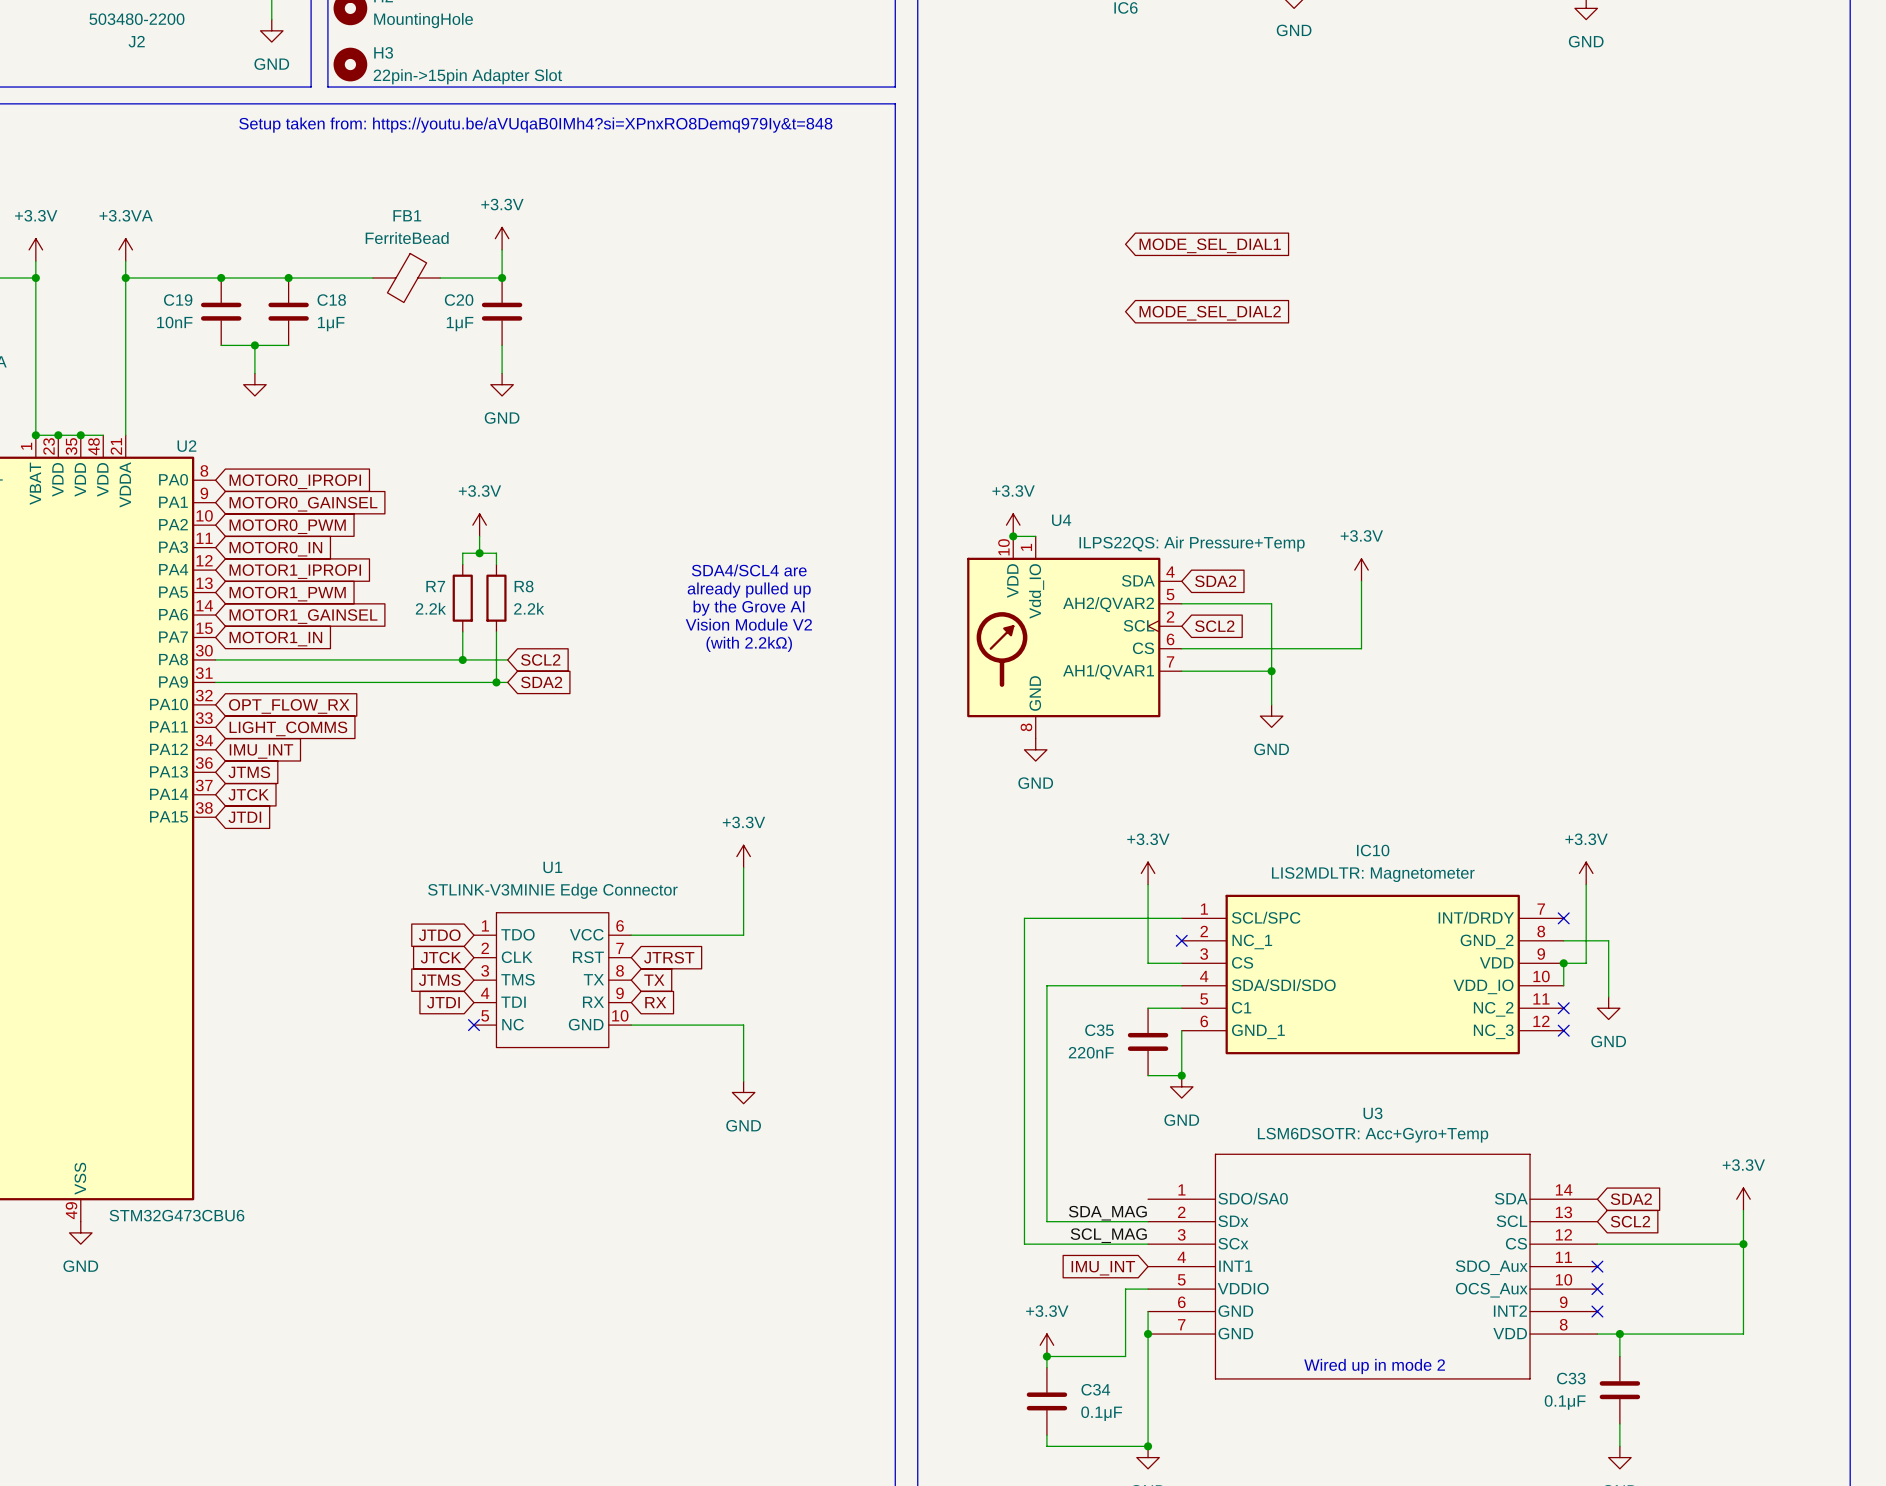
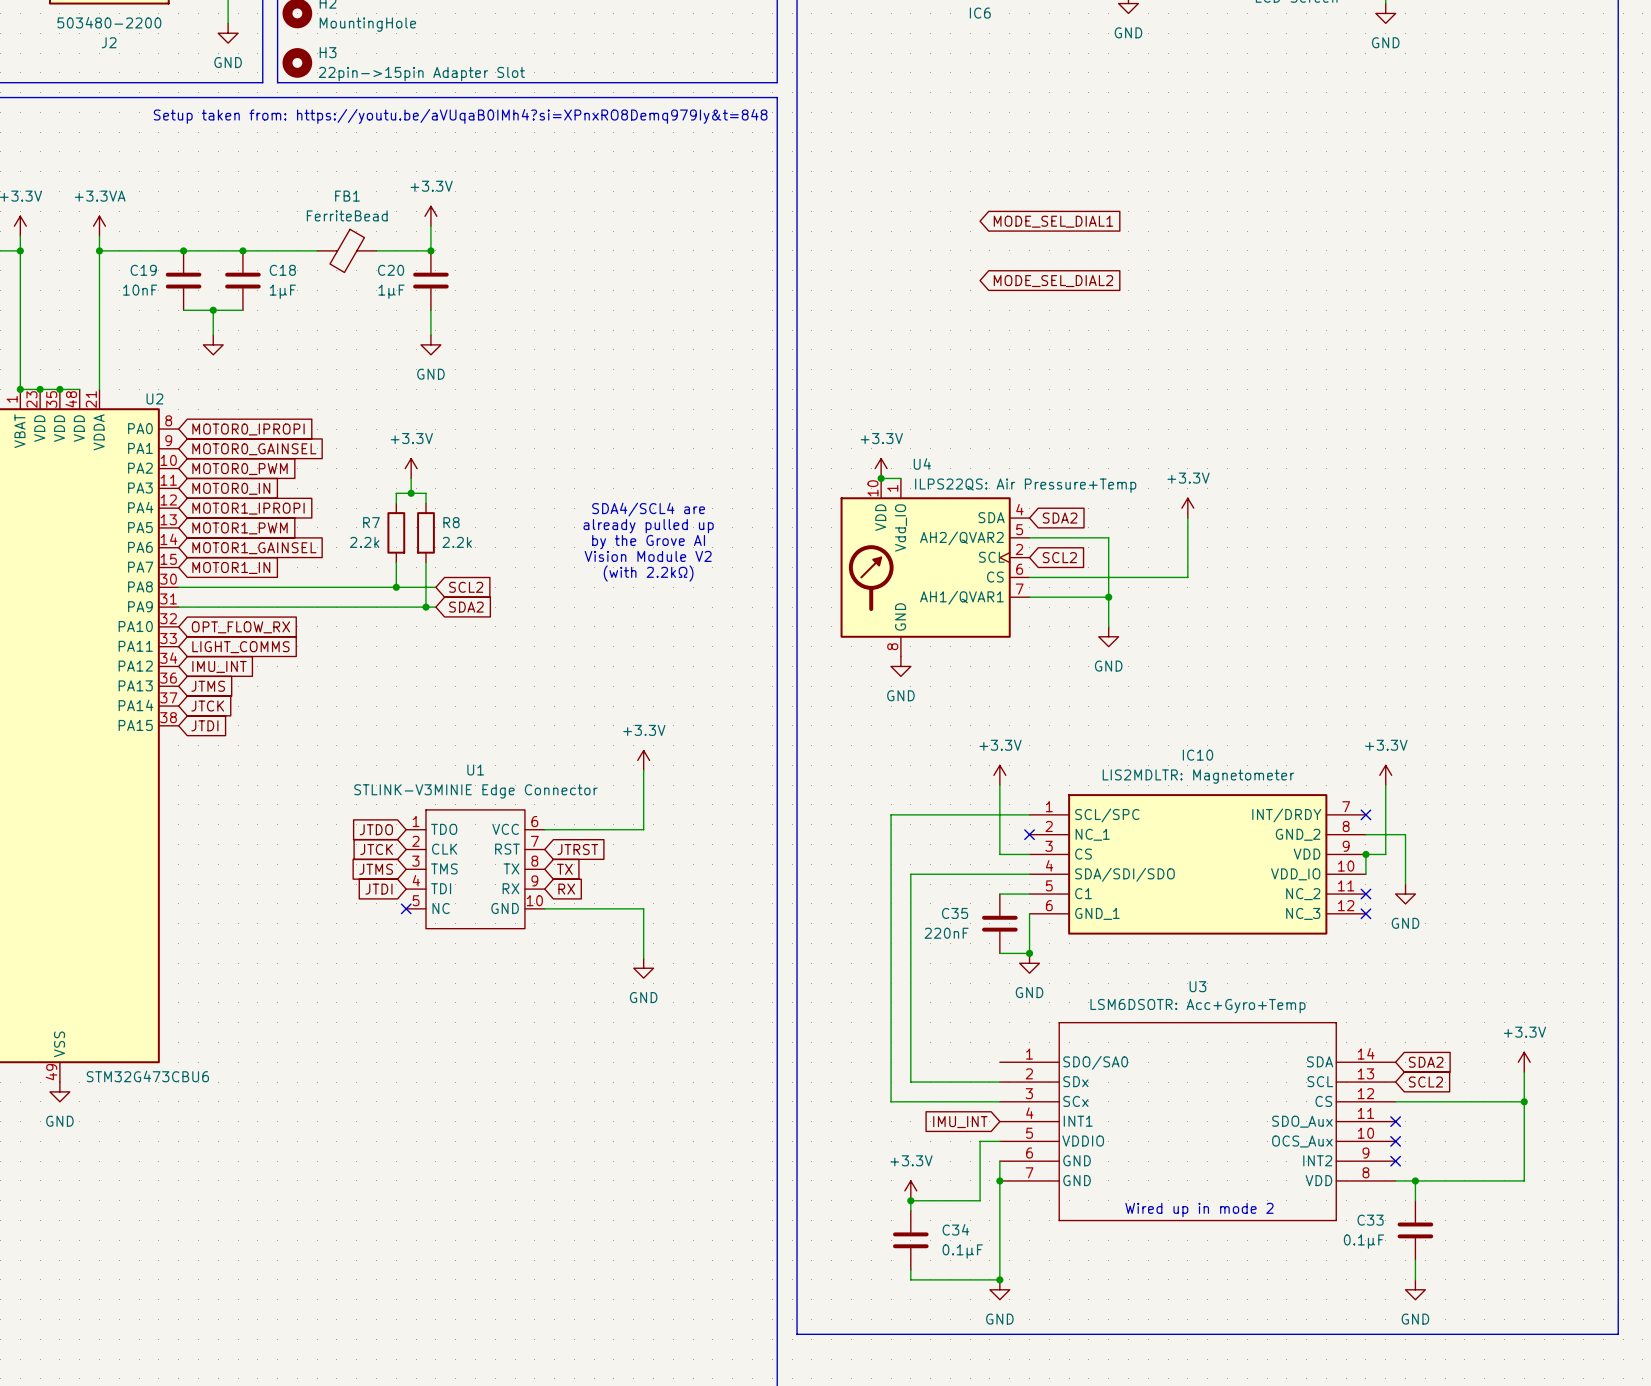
label: SDA_MAG (1107, 1213) -> none
label: SCL_MAG (1108, 1235) -> none

